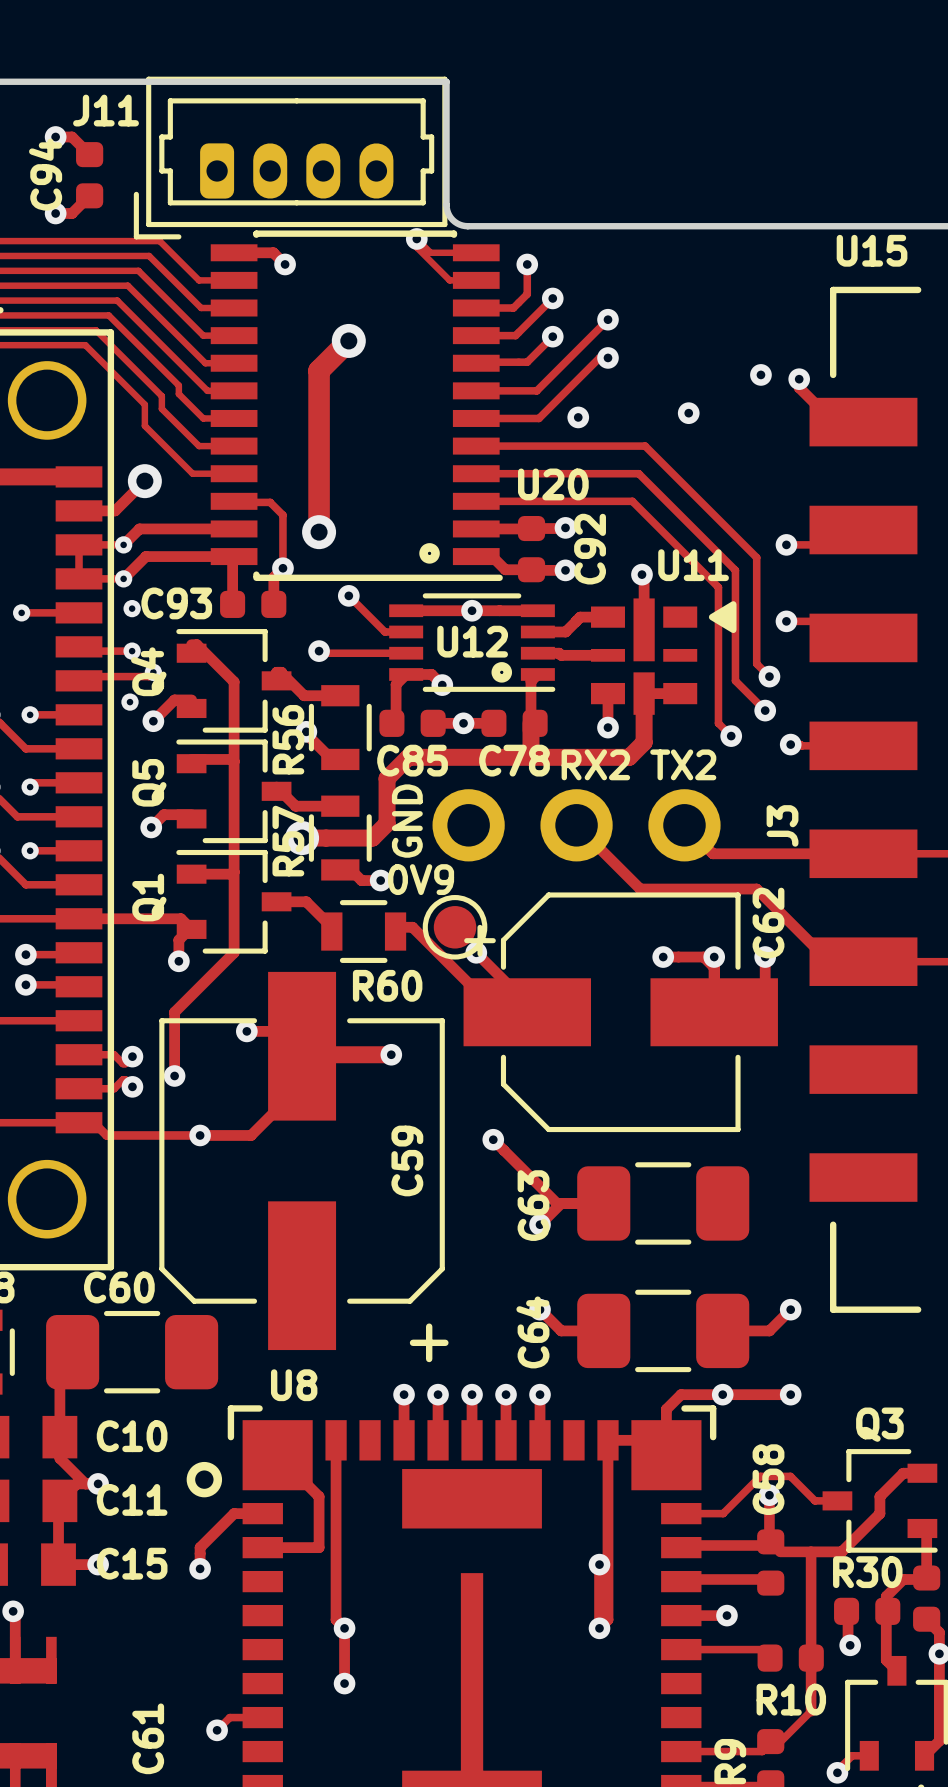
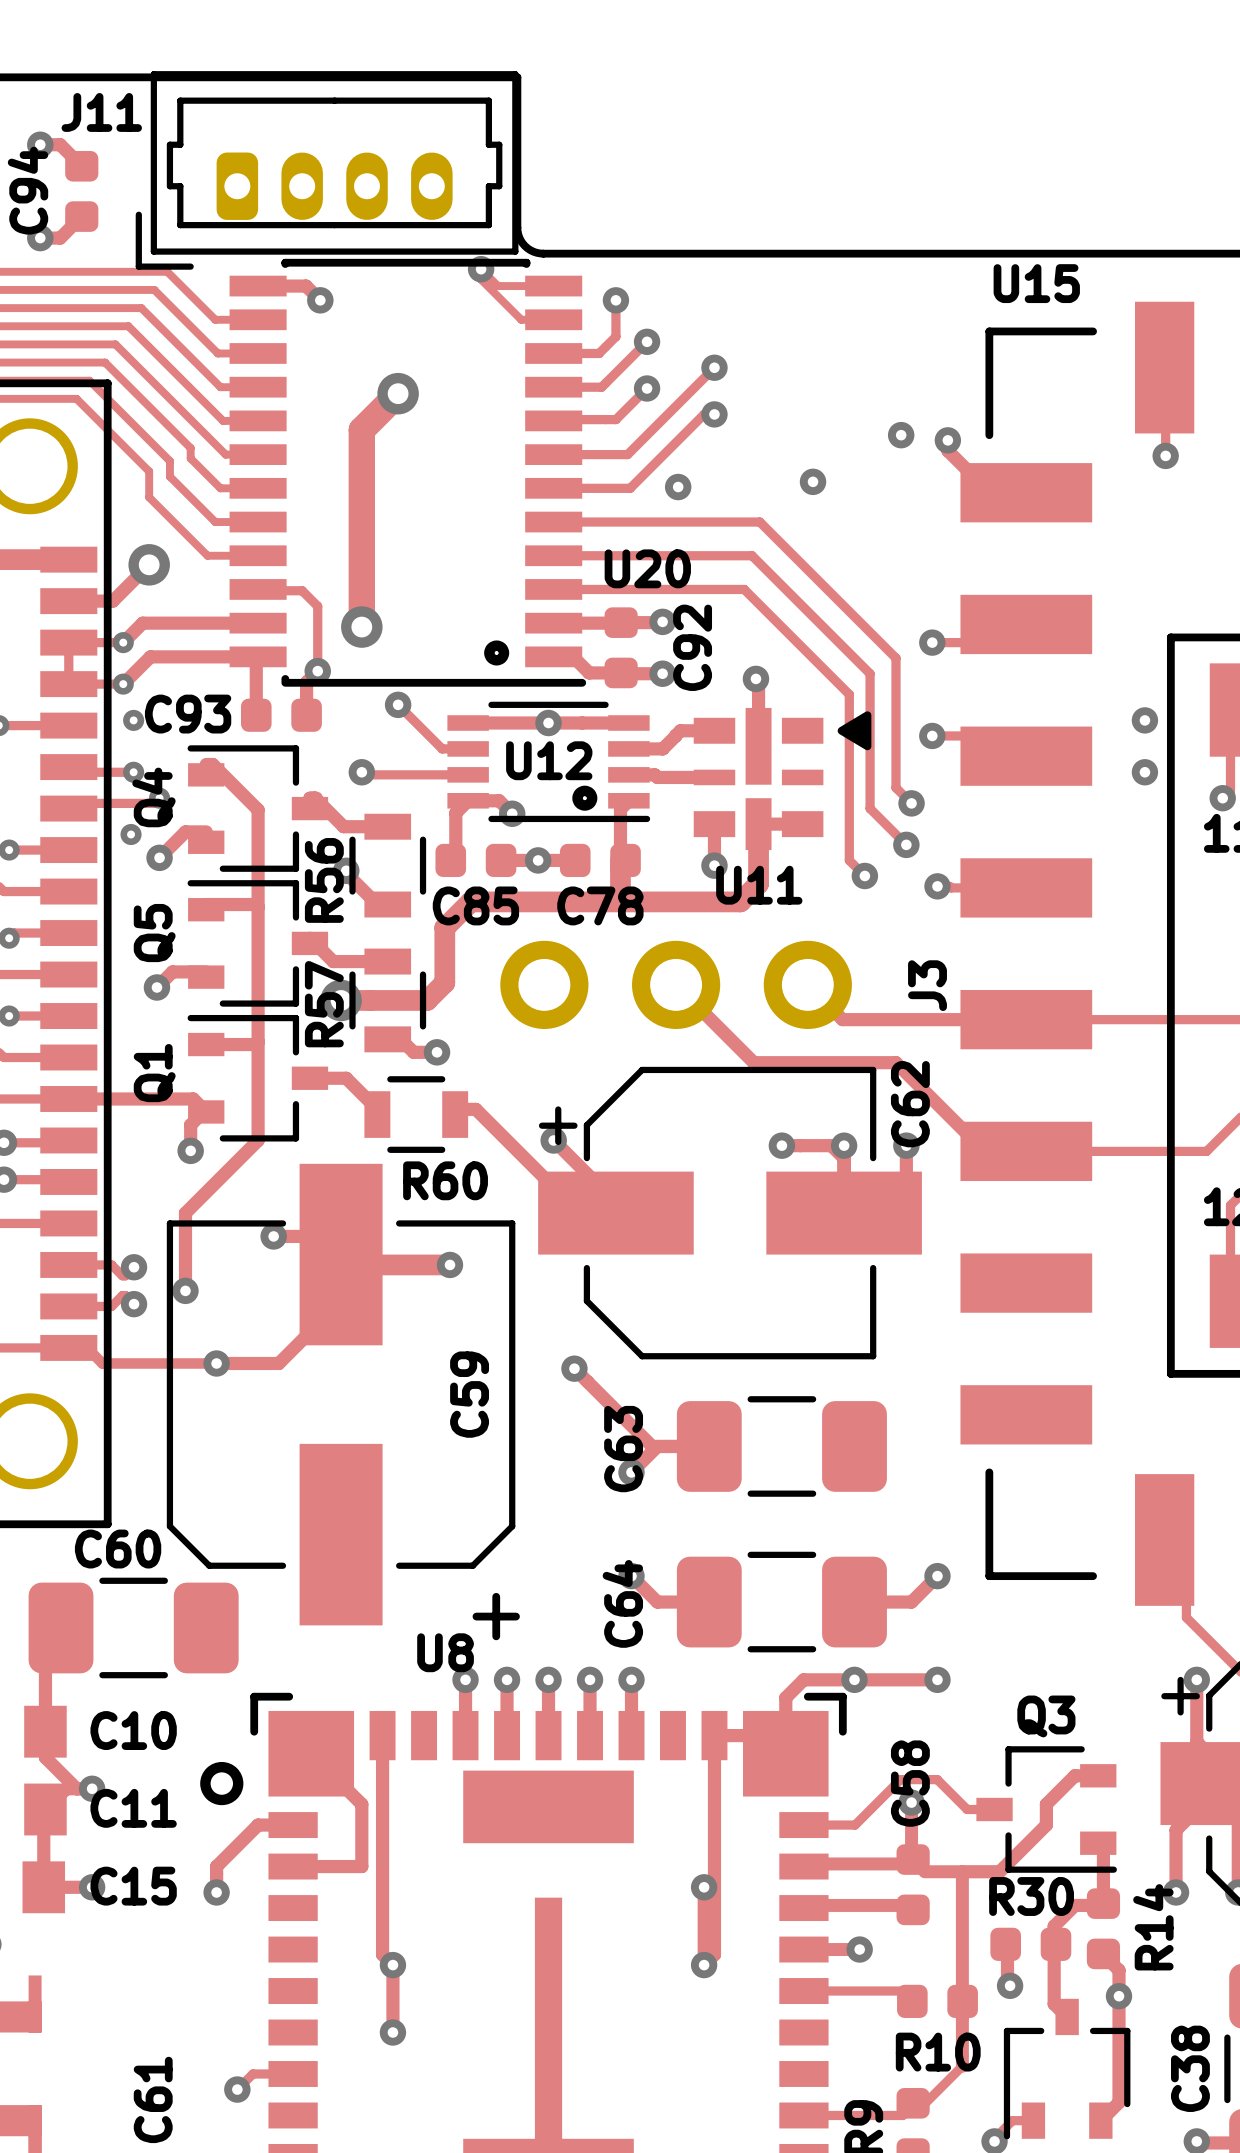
U11 name position: U11 (693, 565) -> U11 (759, 885)
text: RX2 (595, 764) -> none
text: TX2 (683, 764) -> none
text: GND (407, 821) -> none
text: 0V9 (421, 879) -> none
part: (455, 927) -> none
U8 name position: U8 (294, 1385) -> U8 (445, 1652)

